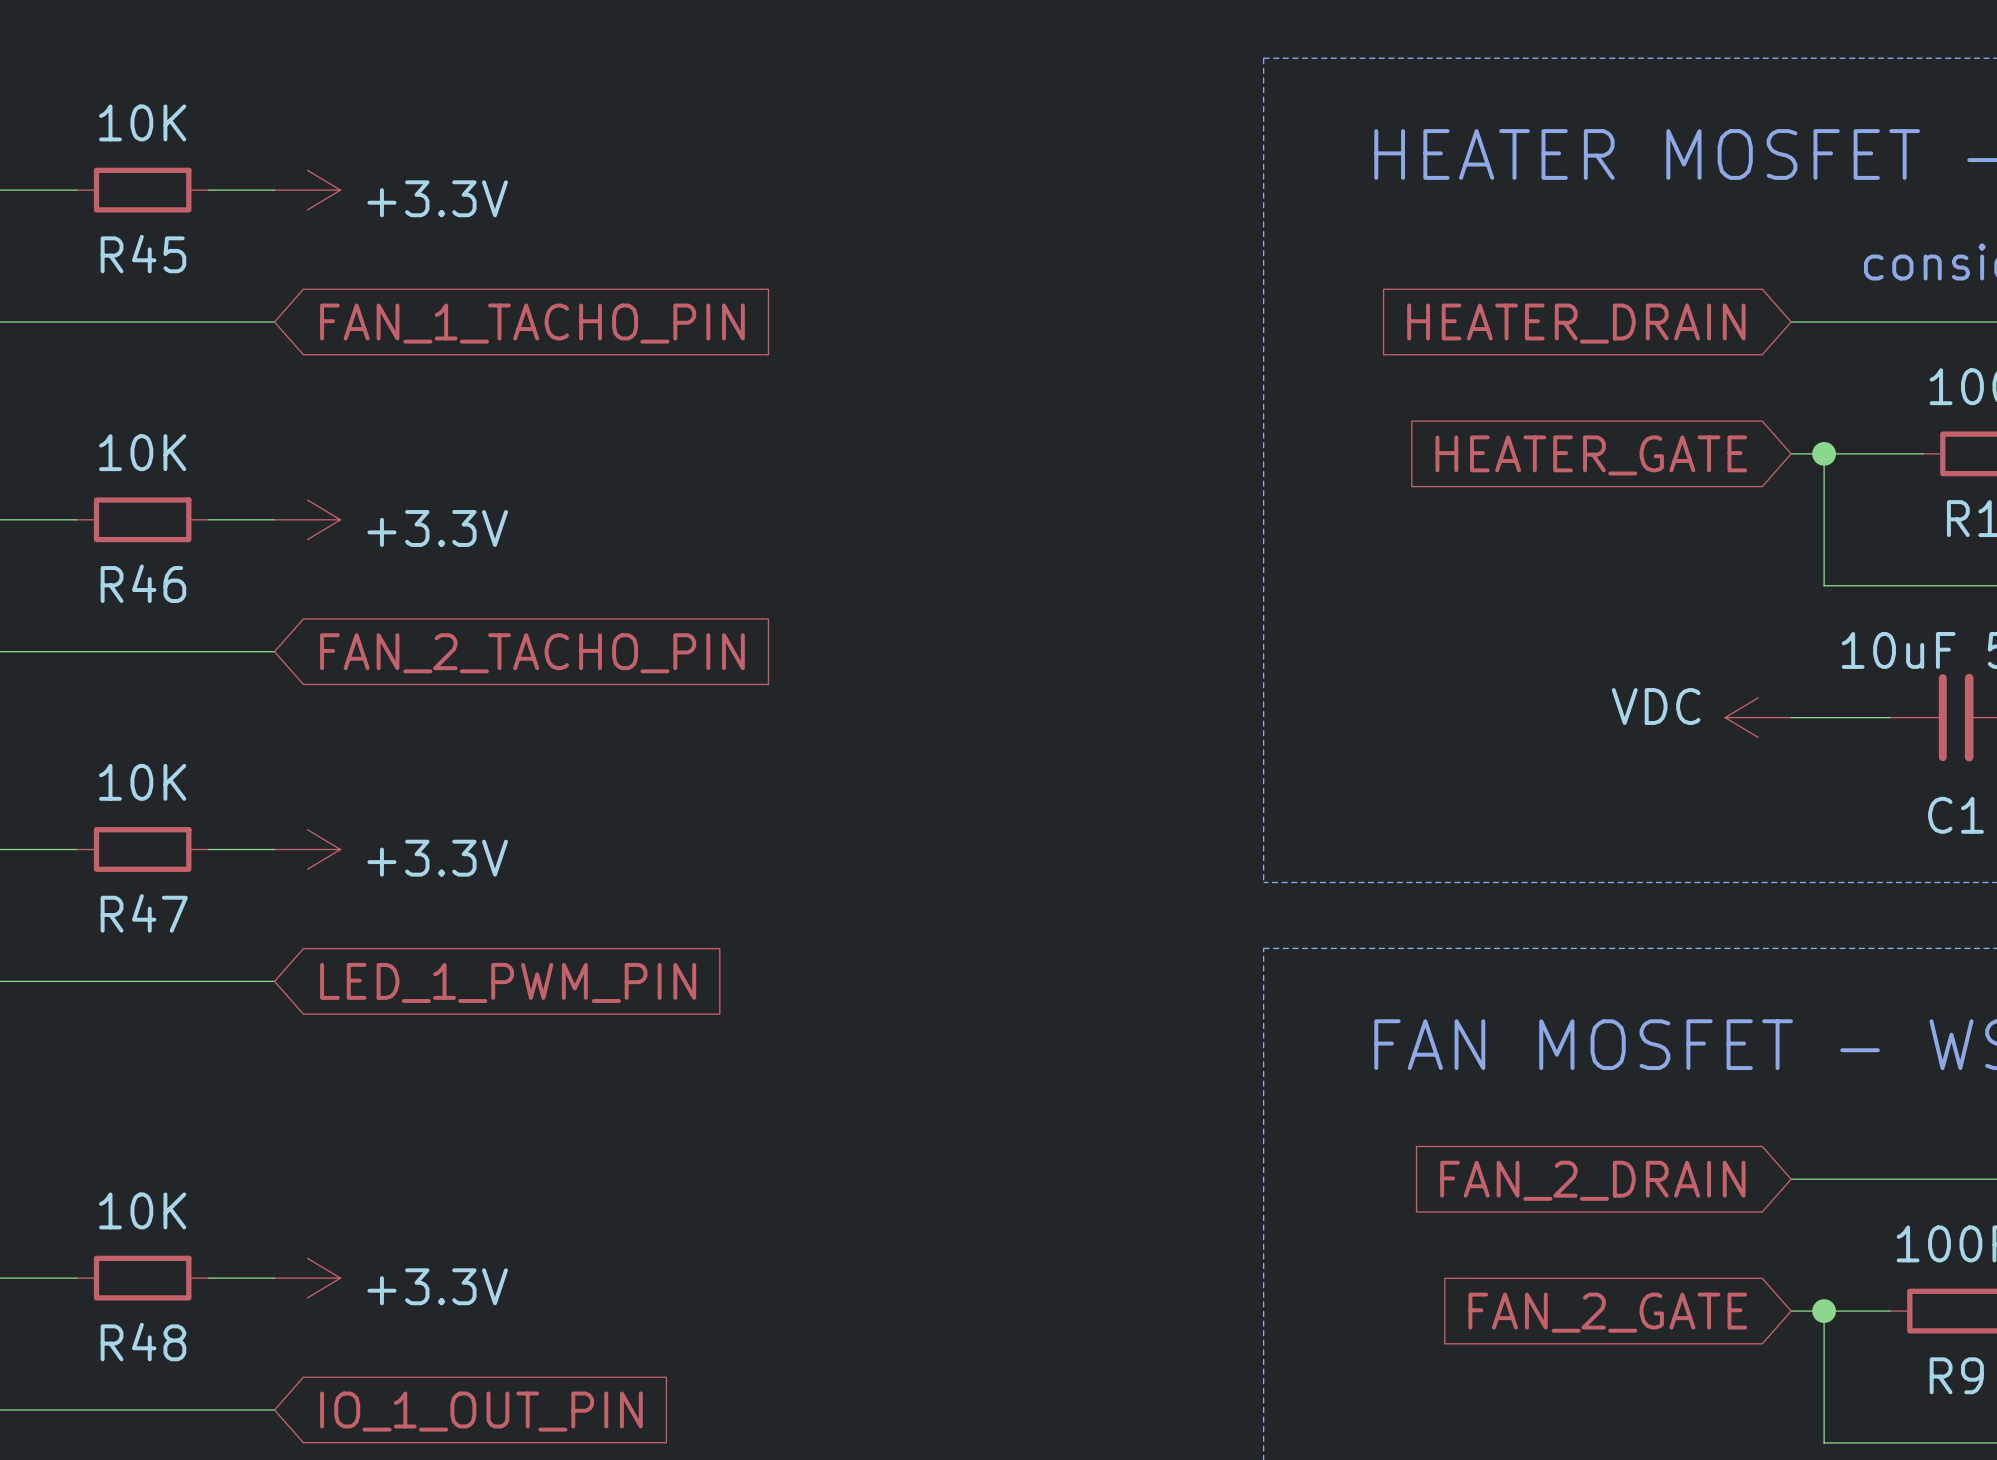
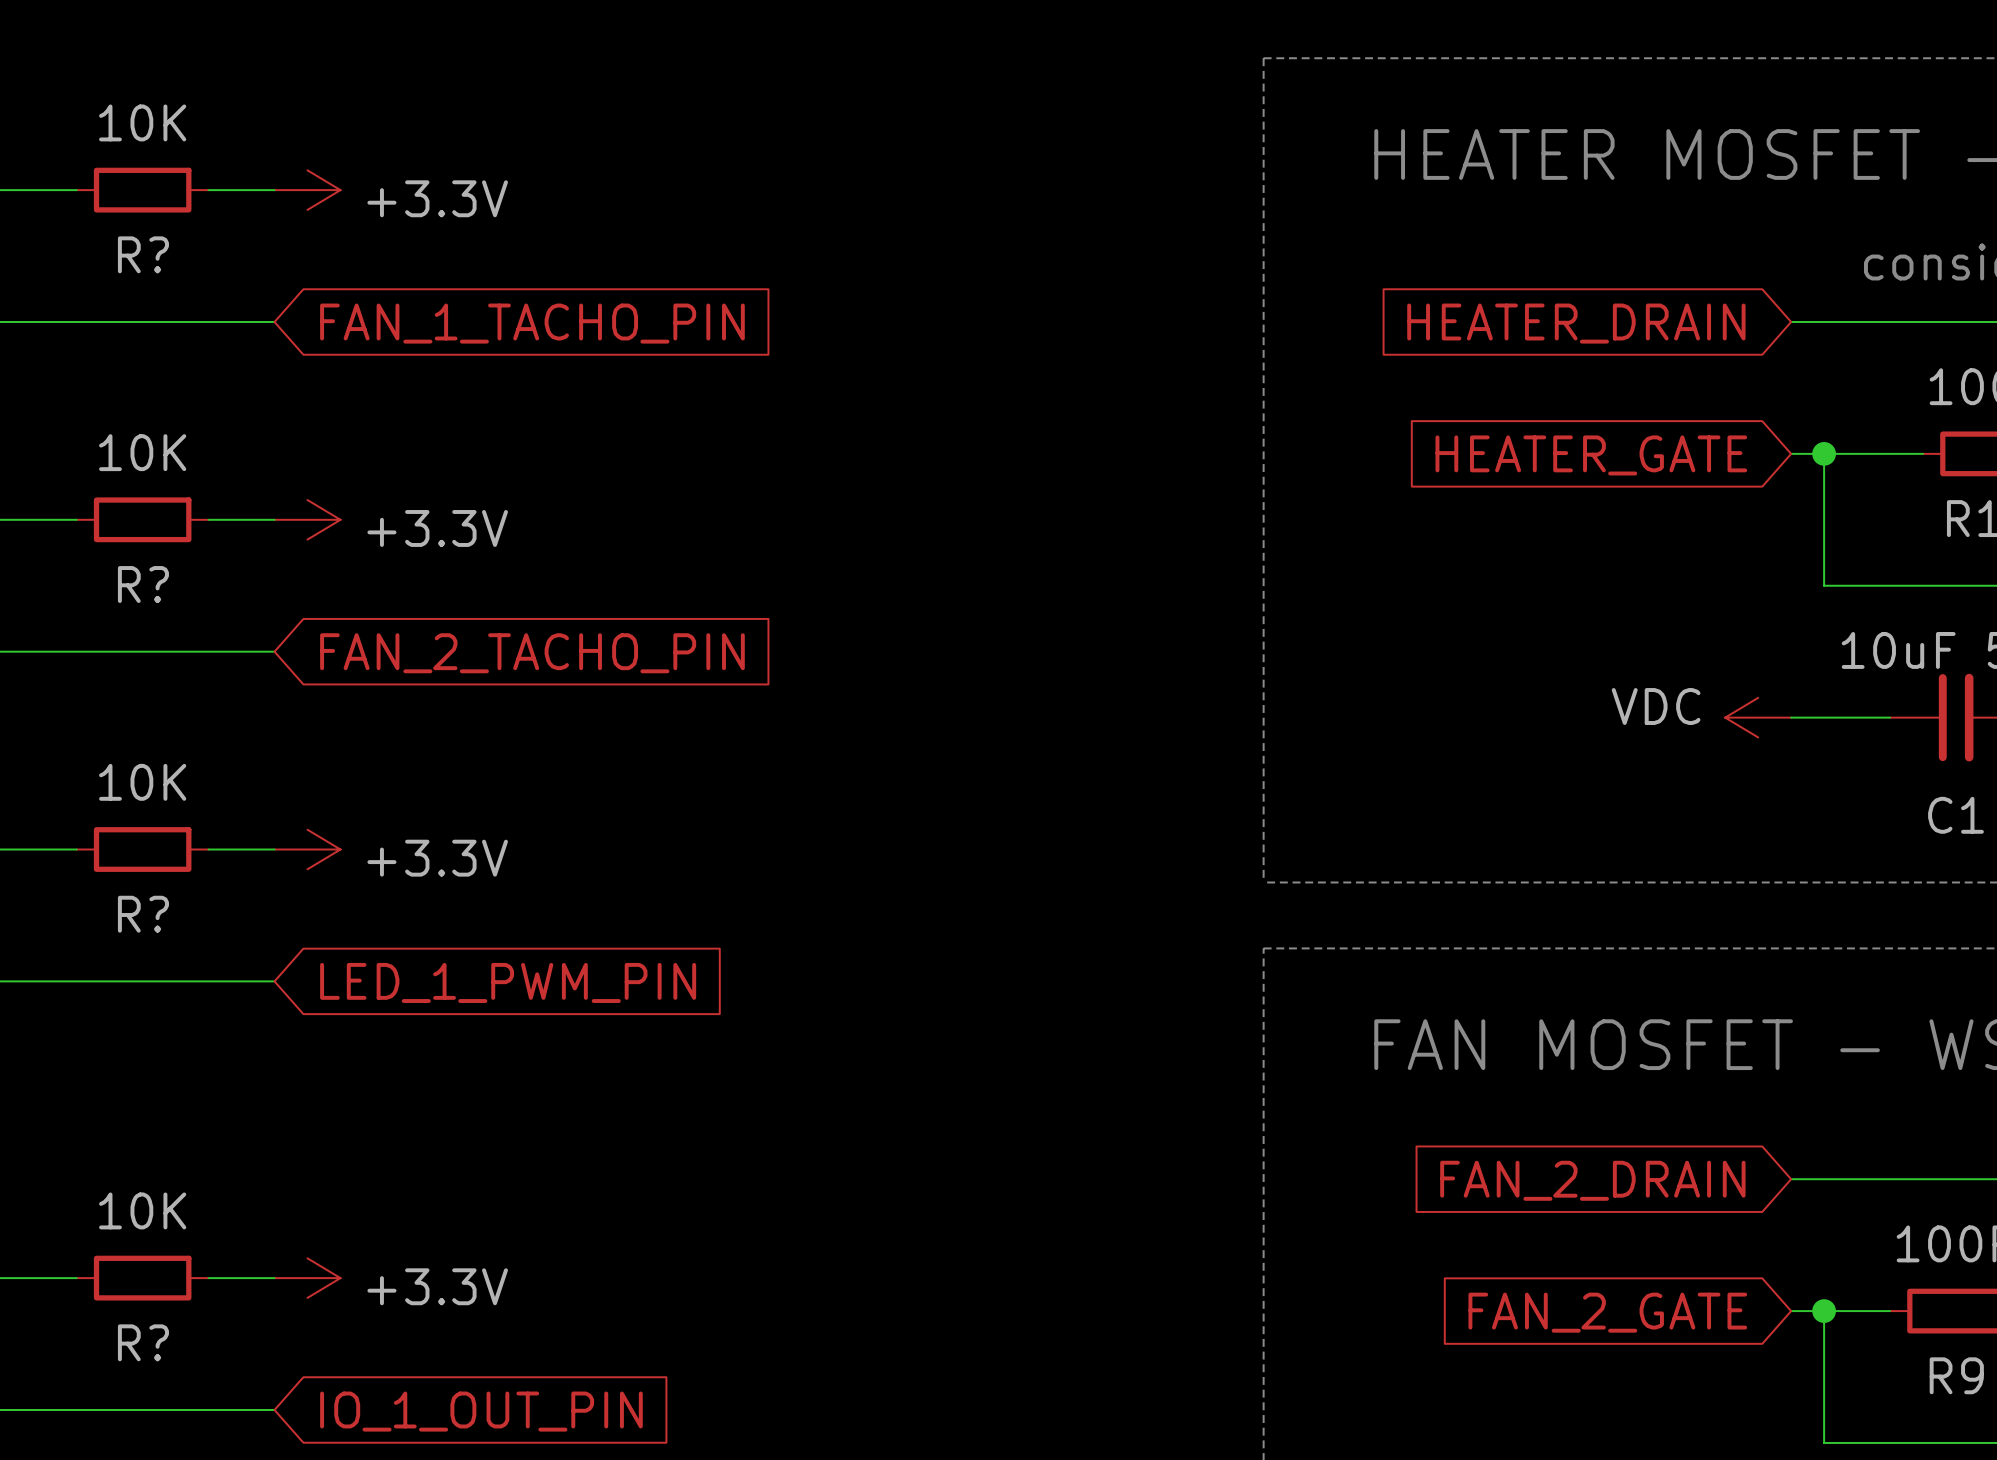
R45 name: R45 (143, 254) -> R? (143, 254)
R46 name: R46 (143, 583) -> R? (143, 584)
R47 name: R47 (144, 913) -> R? (143, 914)
R48 name: R48 (143, 1342) -> R? (143, 1342)

